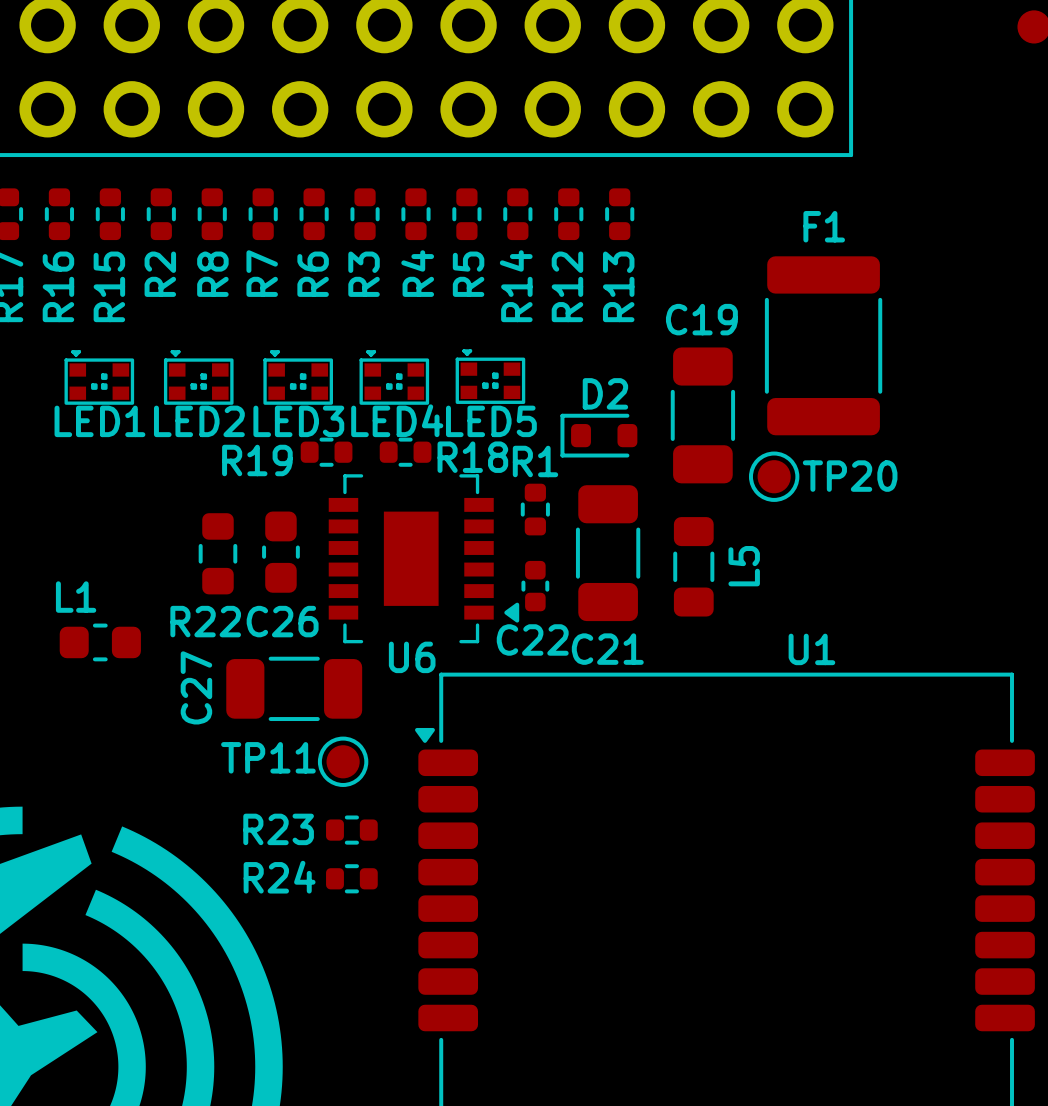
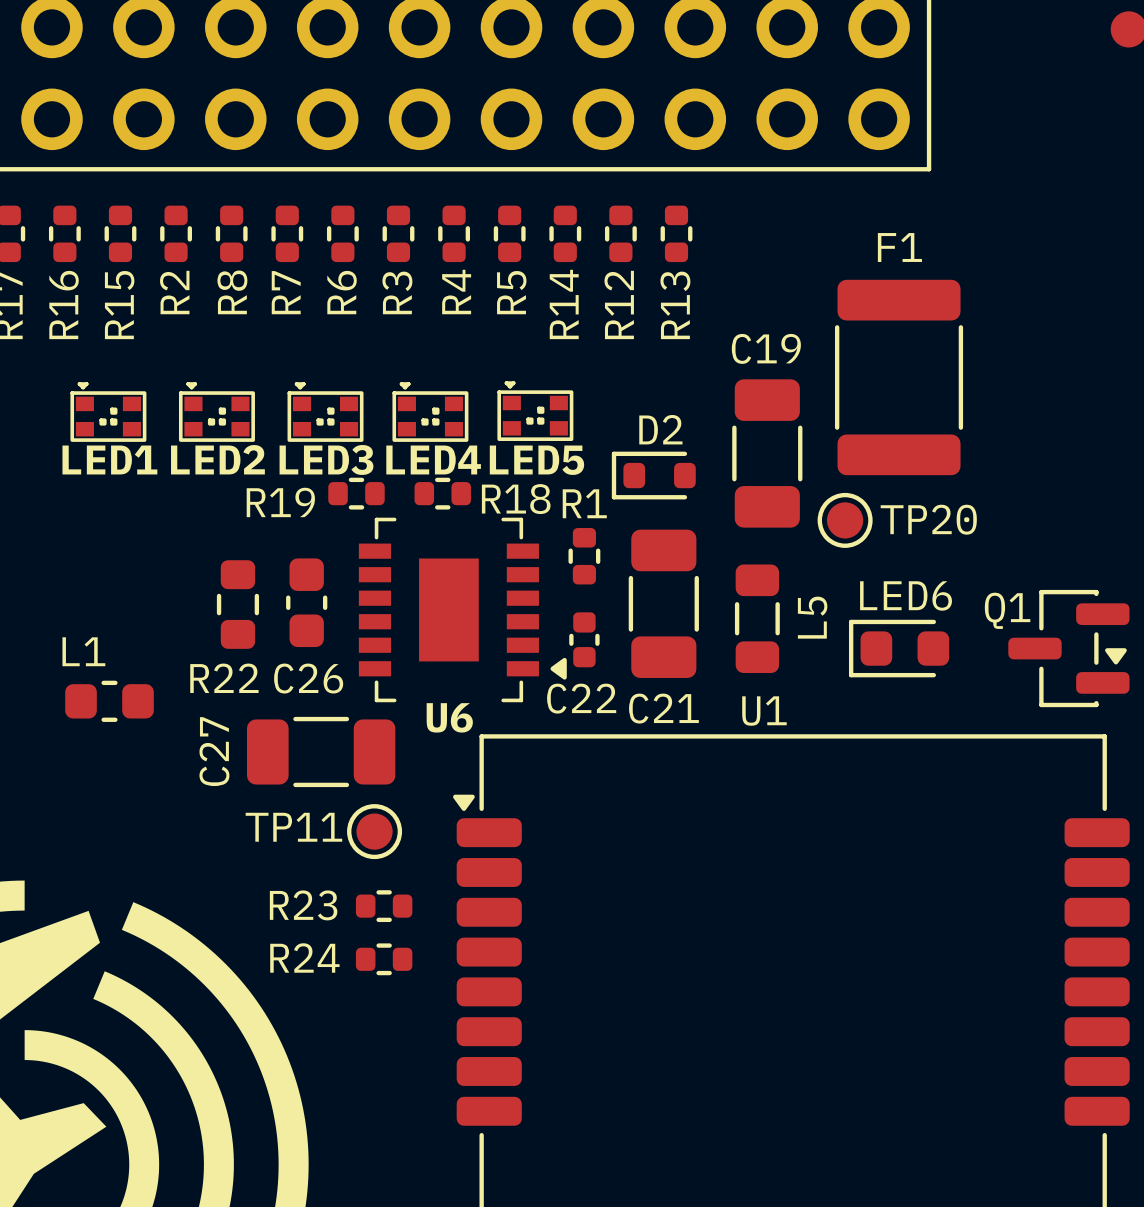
LED6: none -> (899, 648)
Q1: none -> (1068, 648)
U1 name position: U1 (811, 649) -> U1 (764, 711)

